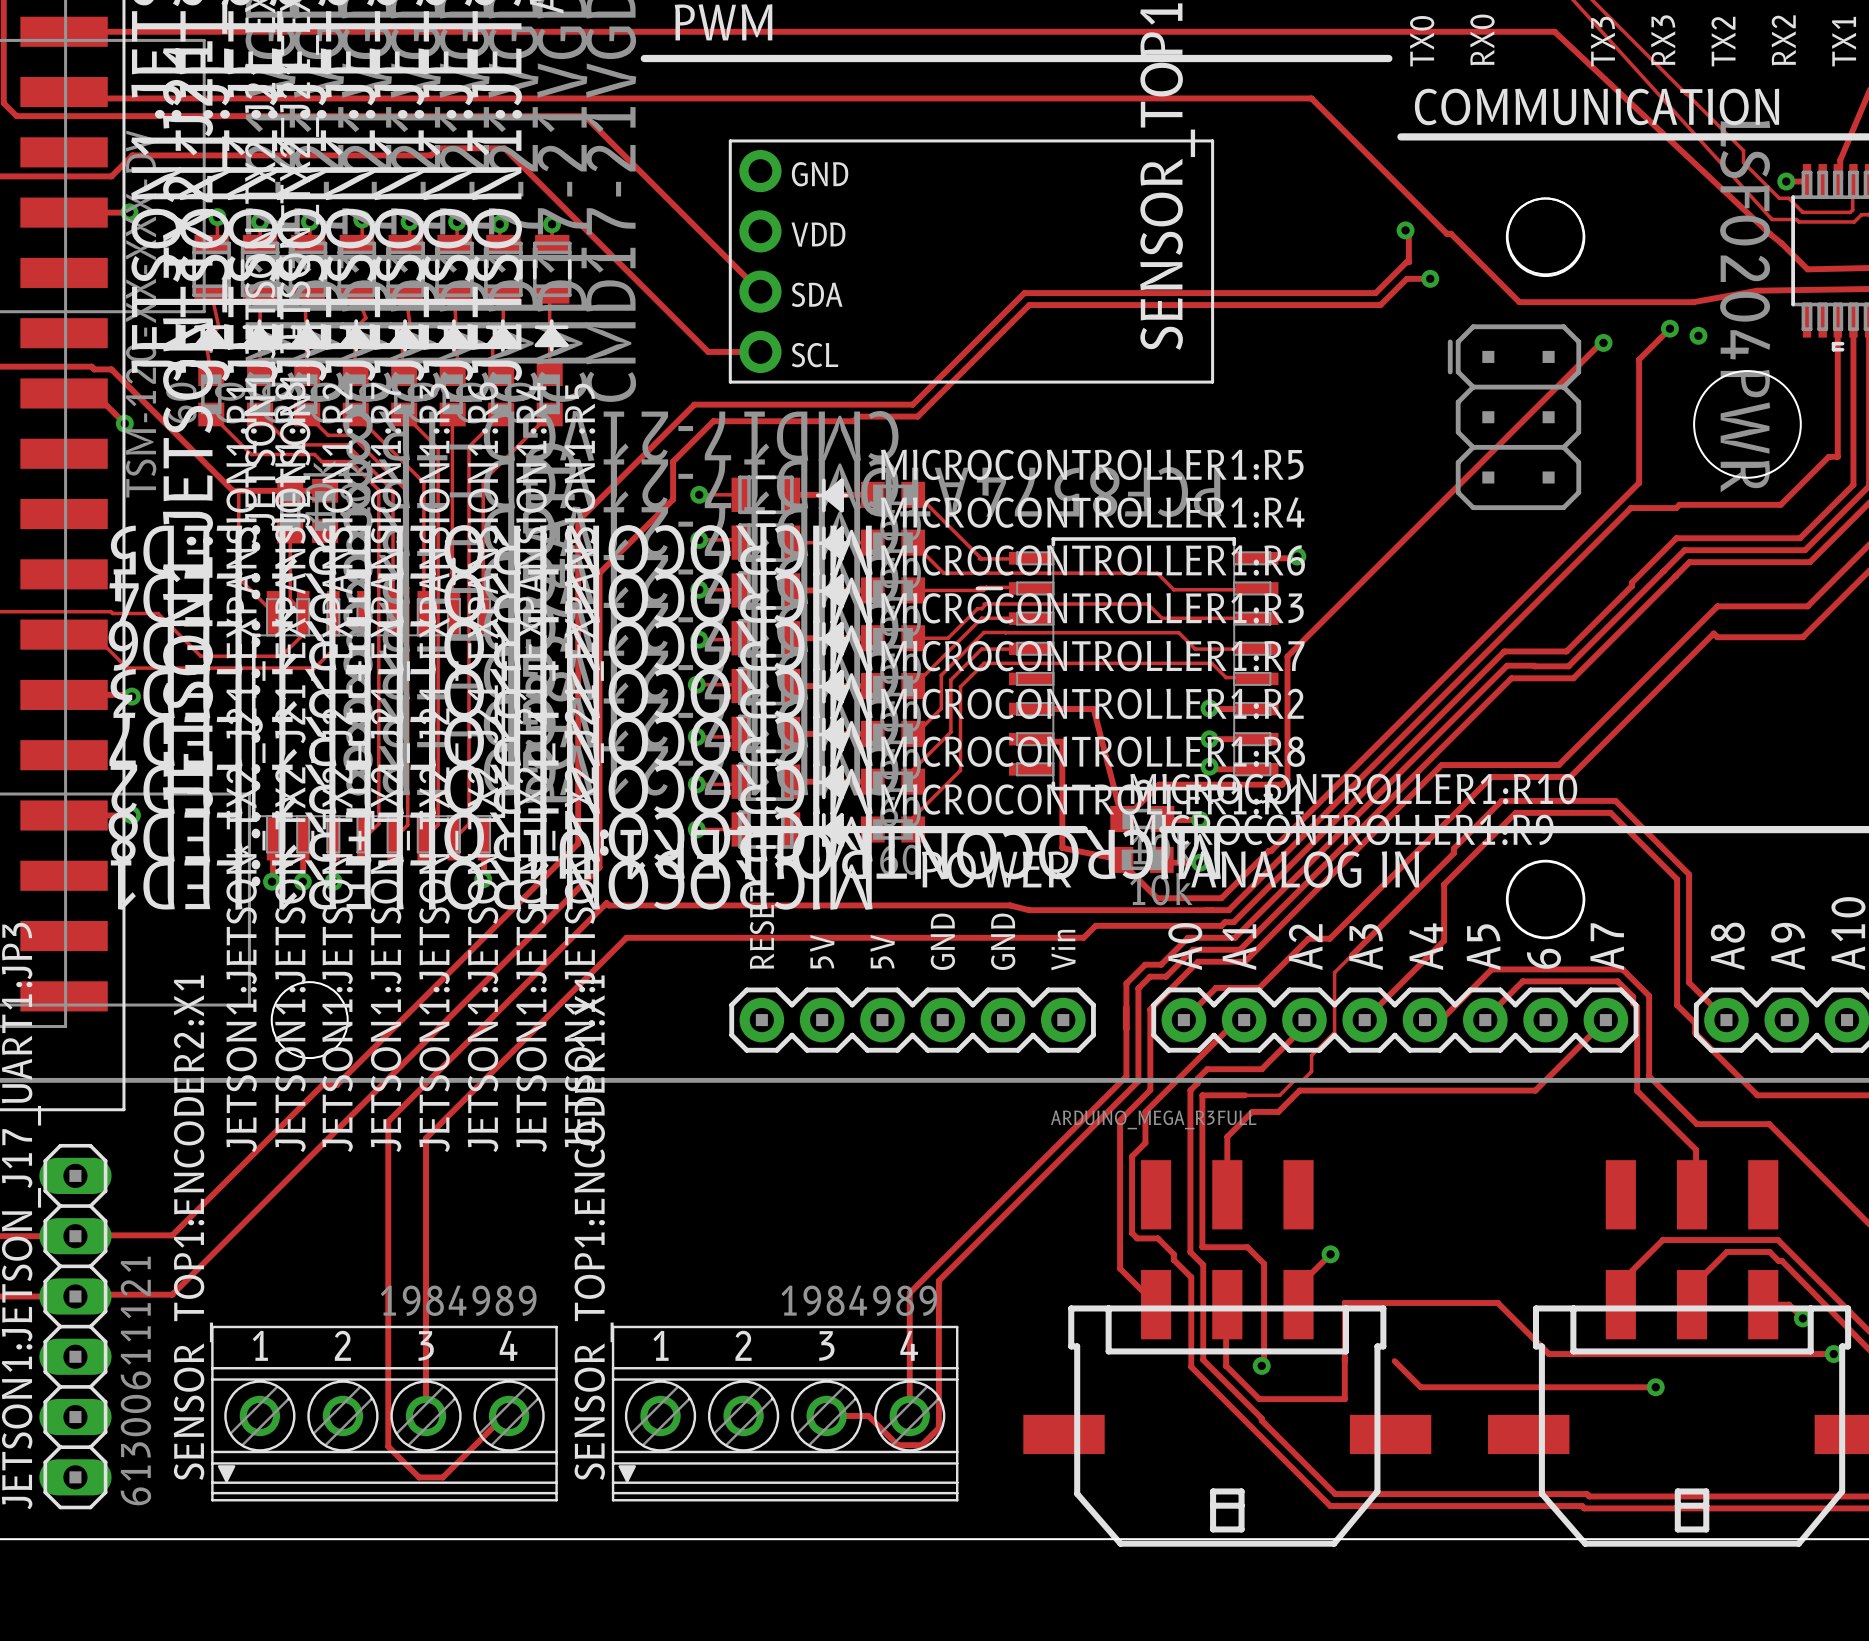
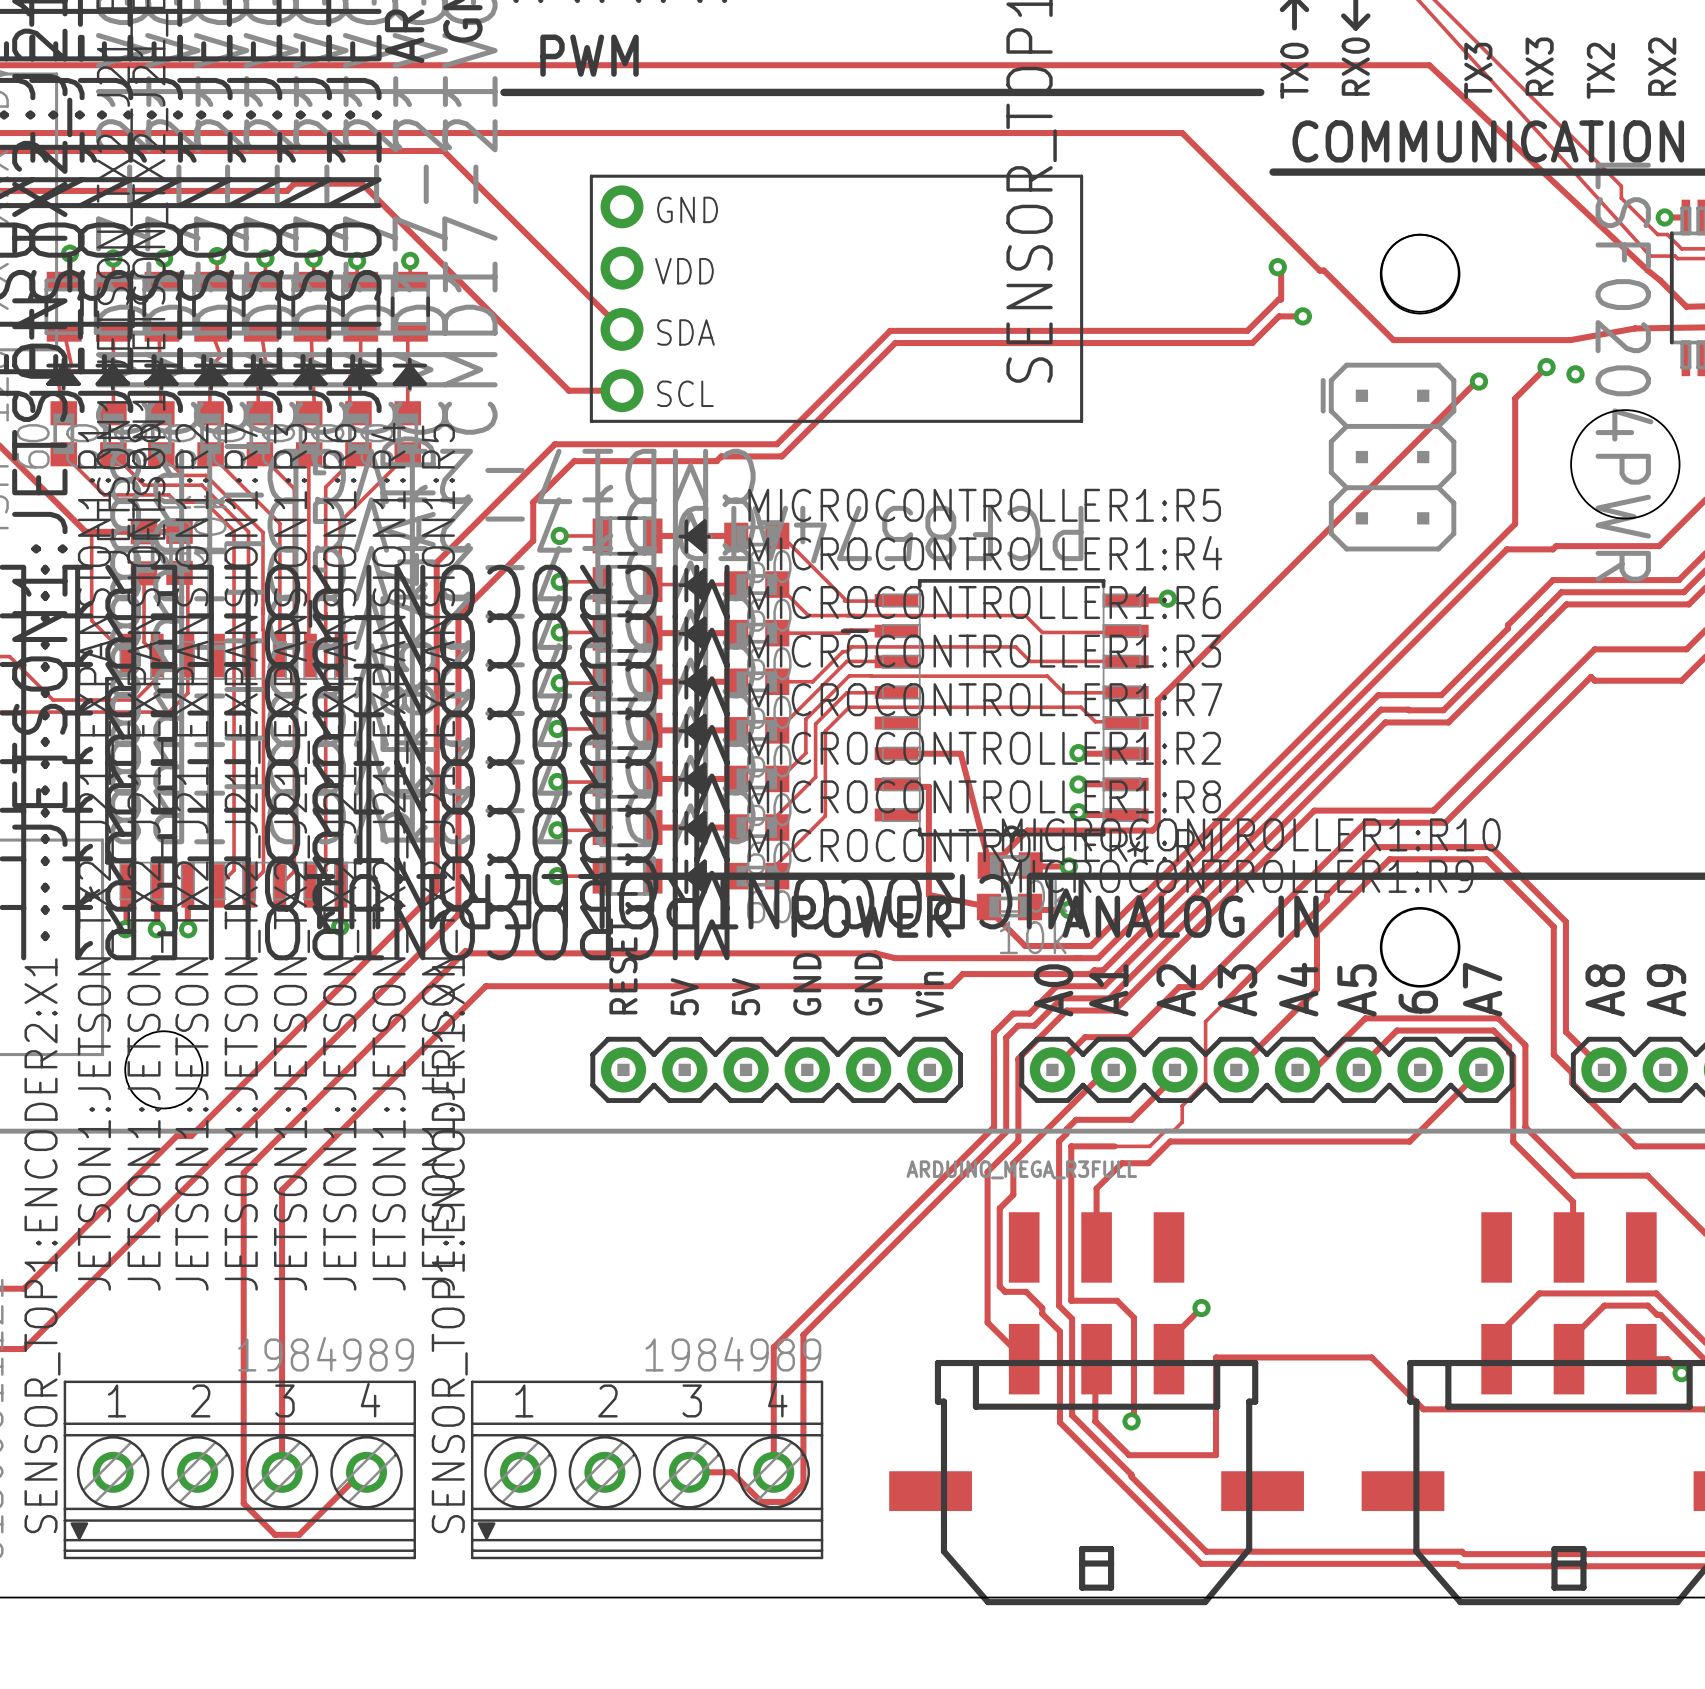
track: (1394, 1361) (1420, 1387) (1655, 1387) -> none
via: (1655, 1387) -> none

